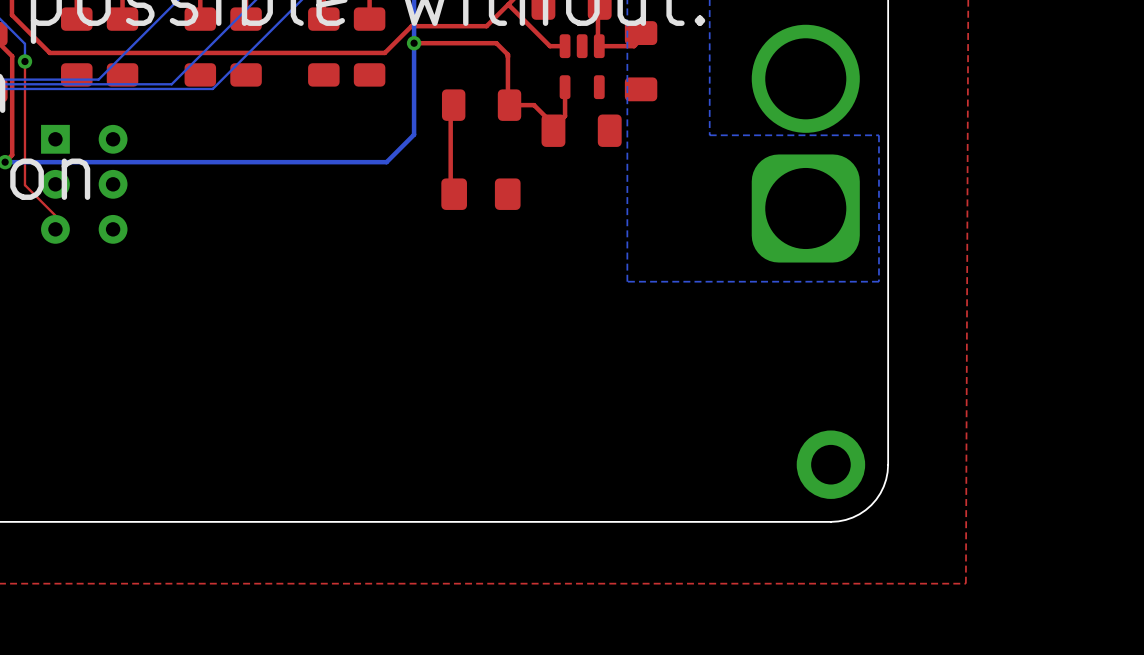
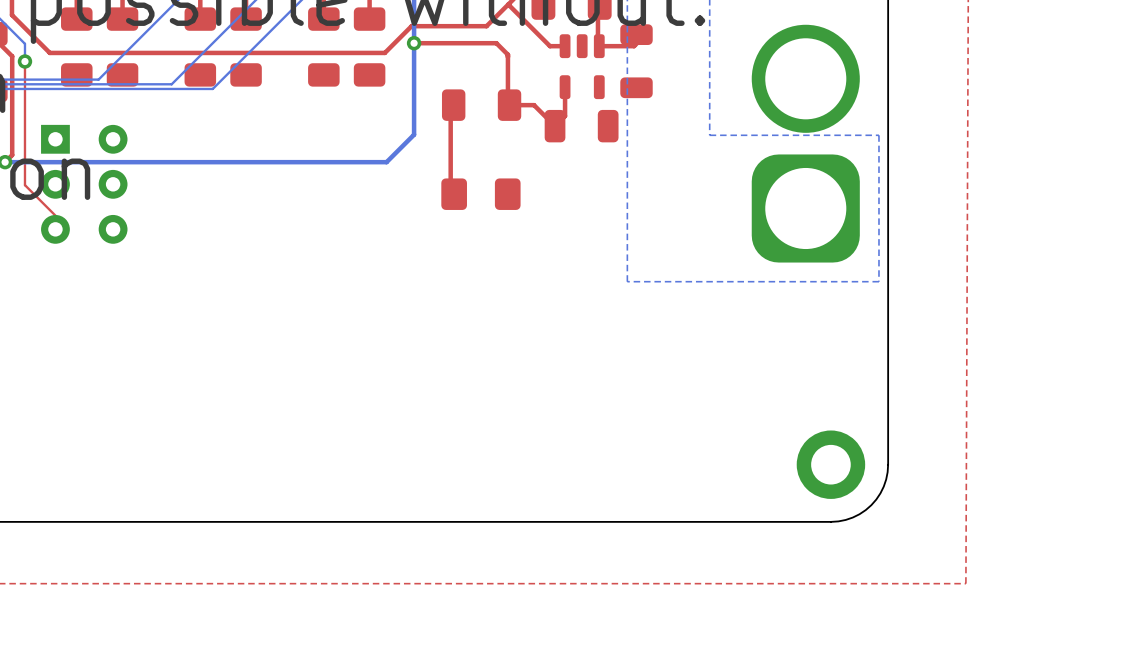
part footprint: [624, 21, 658, 102] -> [620, 24, 653, 99]
part footprint: [541, 114, 622, 147] -> [544, 109, 619, 143]

